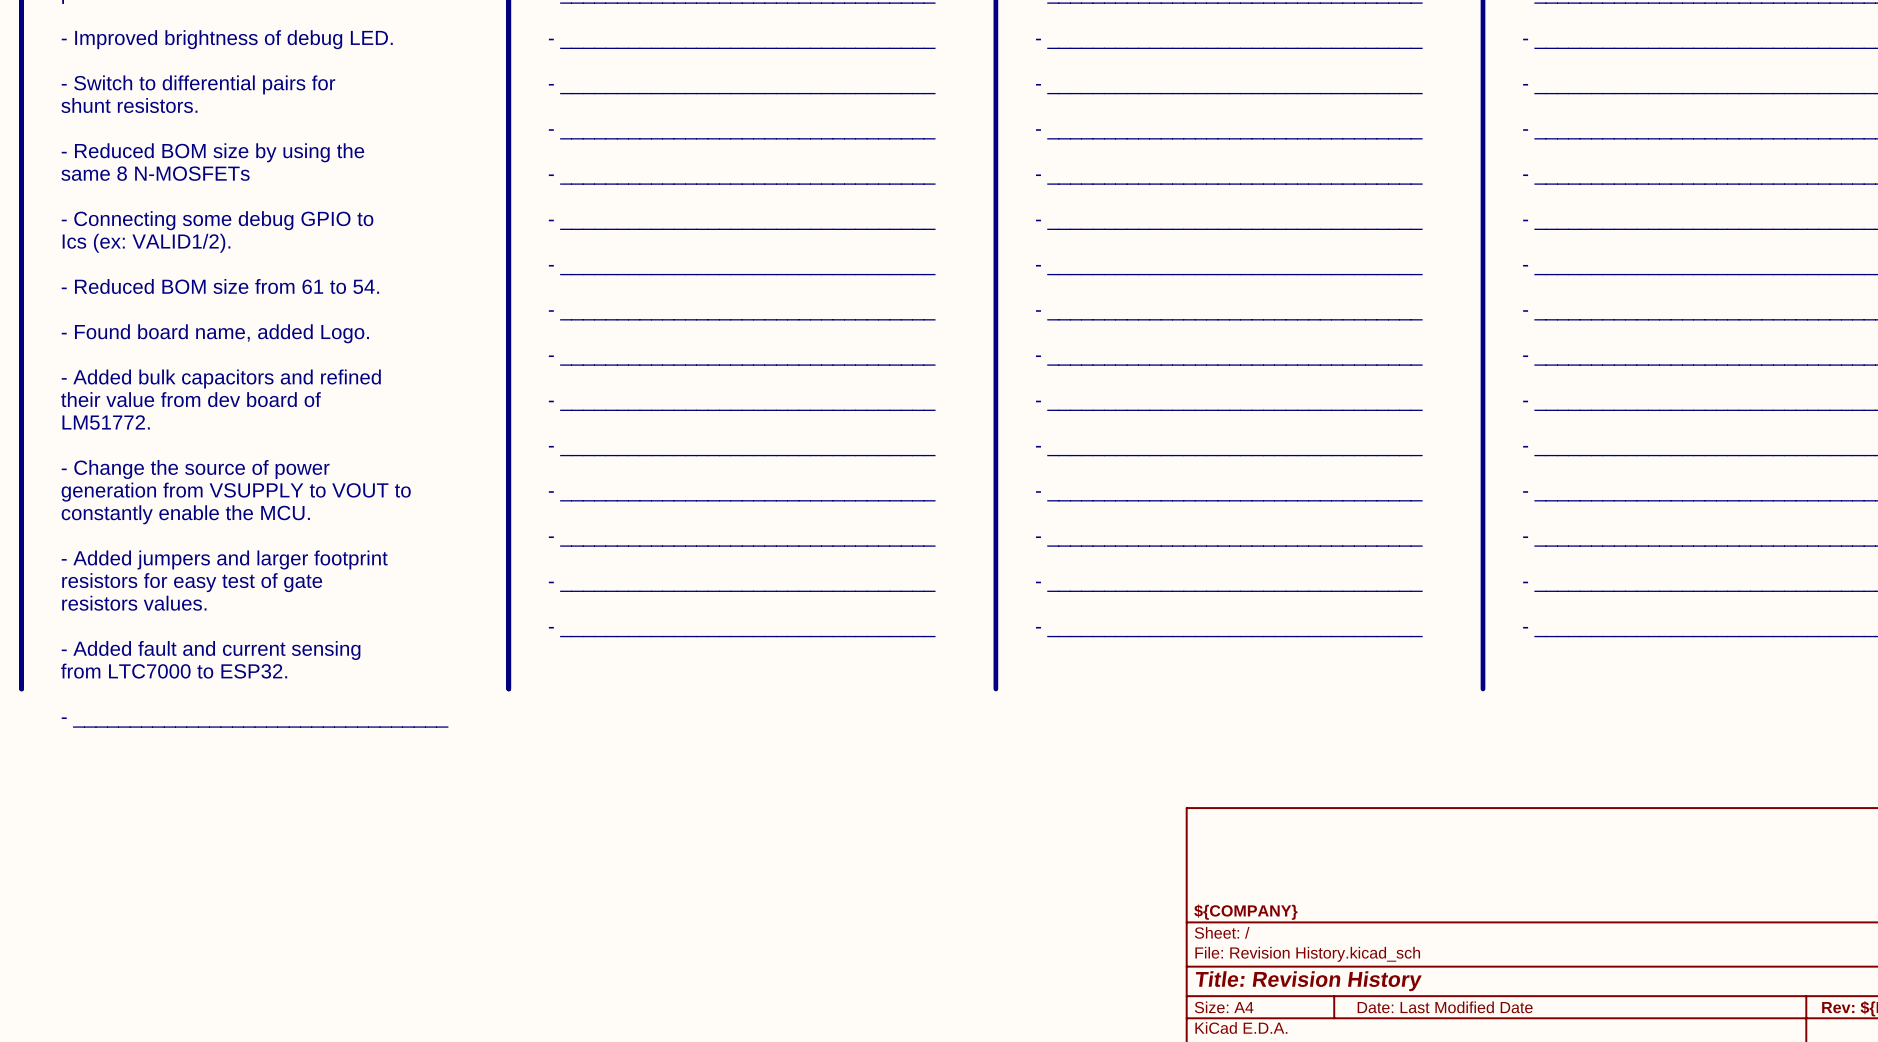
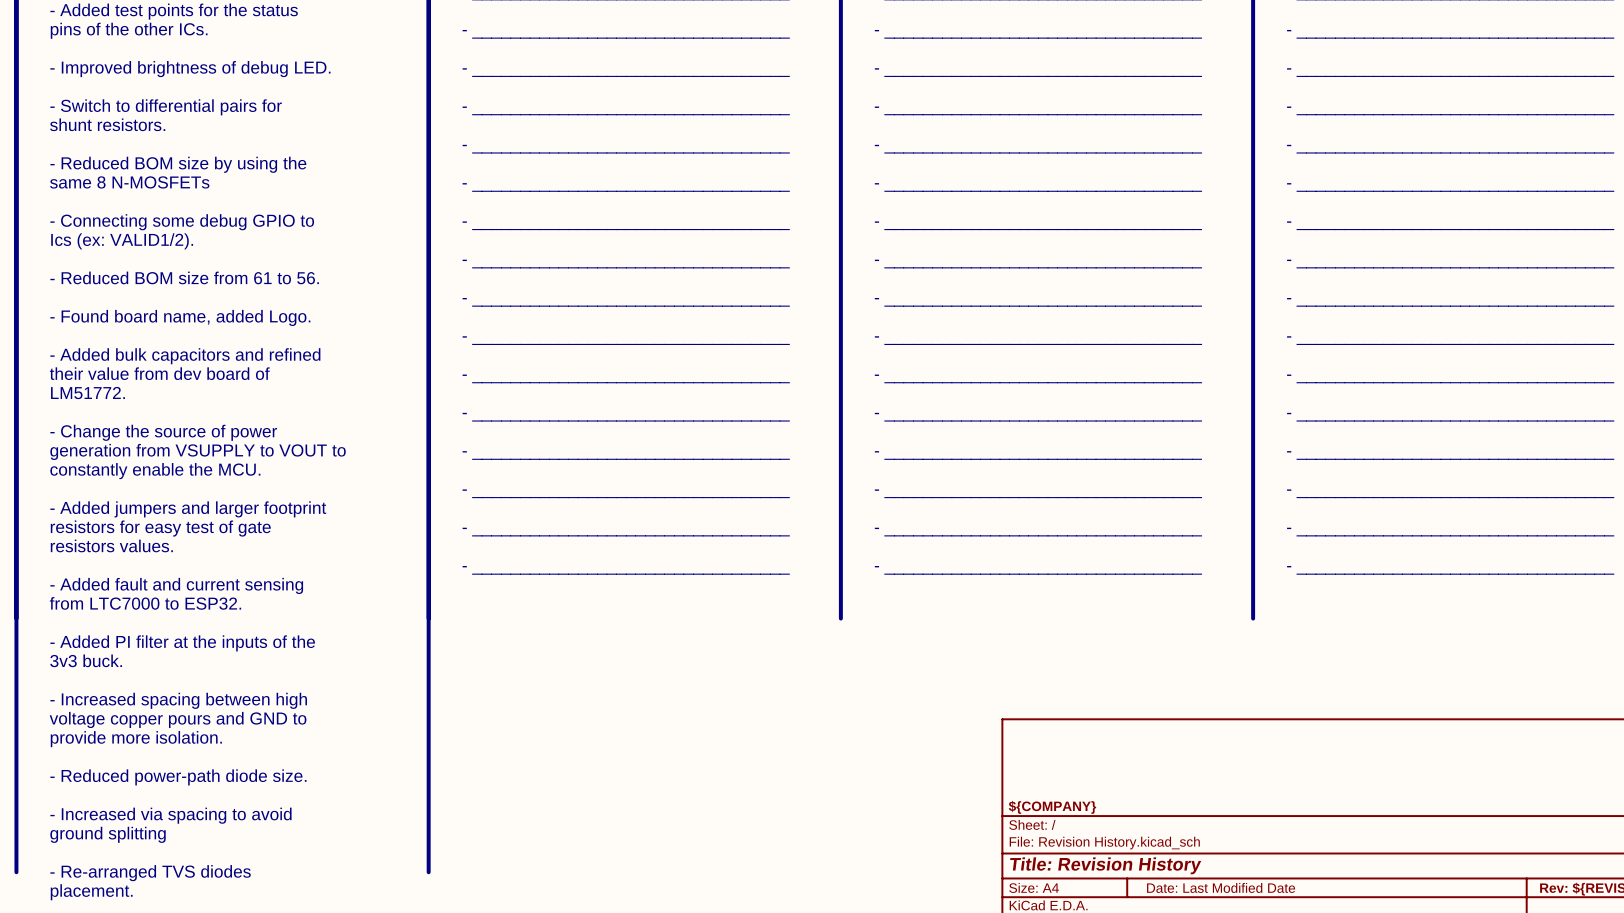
text: - Reduced BOM size from 61 to 54. (220, 286) -> - Reduced BOM size from 61 to 56. (184, 277)
line: none -> (16, 618) (16, 872)
line: none -> (428, 618) (428, 872)
text: - _________________________________ (255, 722) -> - Added PI filter at the inputs of the (182, 643)
text: none -> 3v3 buck. (86, 660)
text: none -> - Increased spacing between high (178, 700)
text: none -> voltage copper pours and GND to (178, 719)
text: none -> provide more isolation. (136, 739)
text: none -> - Reduced power-path diode size. (178, 777)
text: none -> - Increased via spacing to avoid (170, 815)
text: none -> ground splitting (108, 834)
text: none -> - Re-arranged TVS diodes (150, 873)
text: none -> placement. (91, 892)

